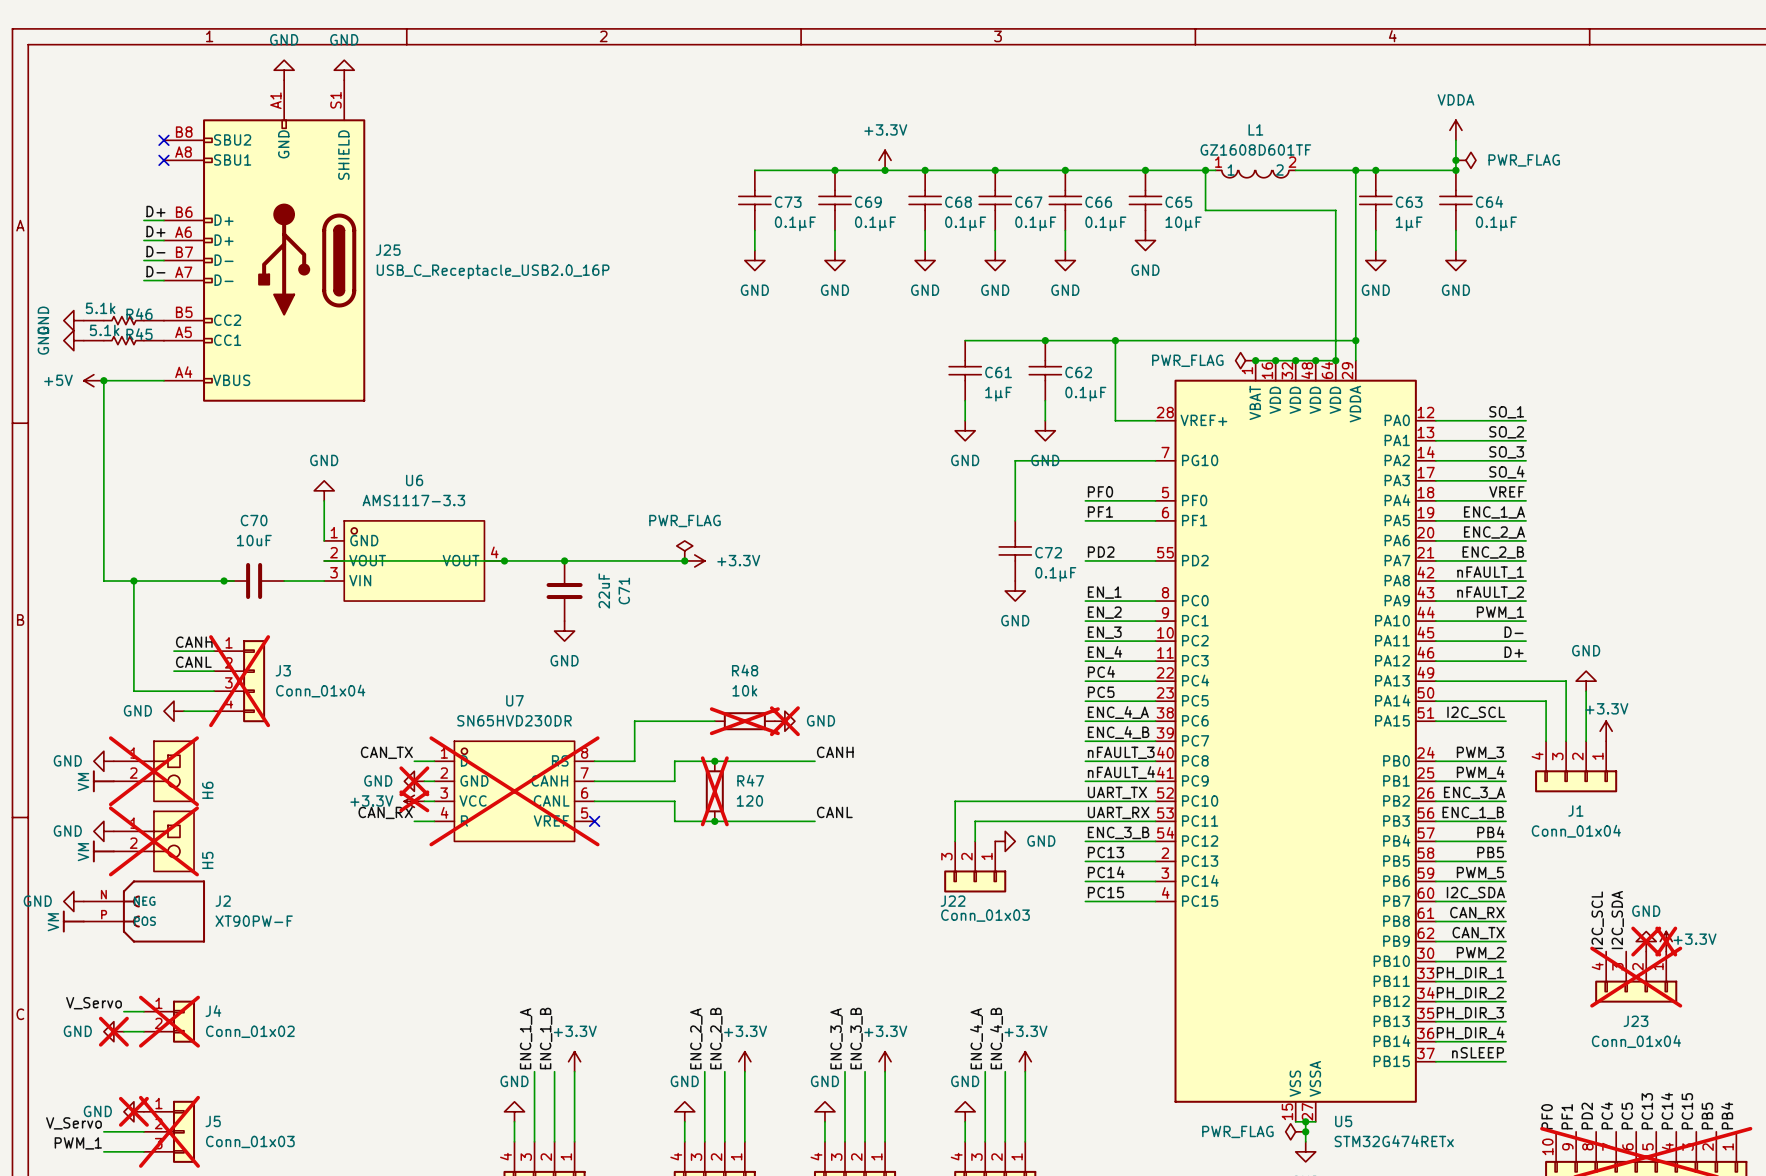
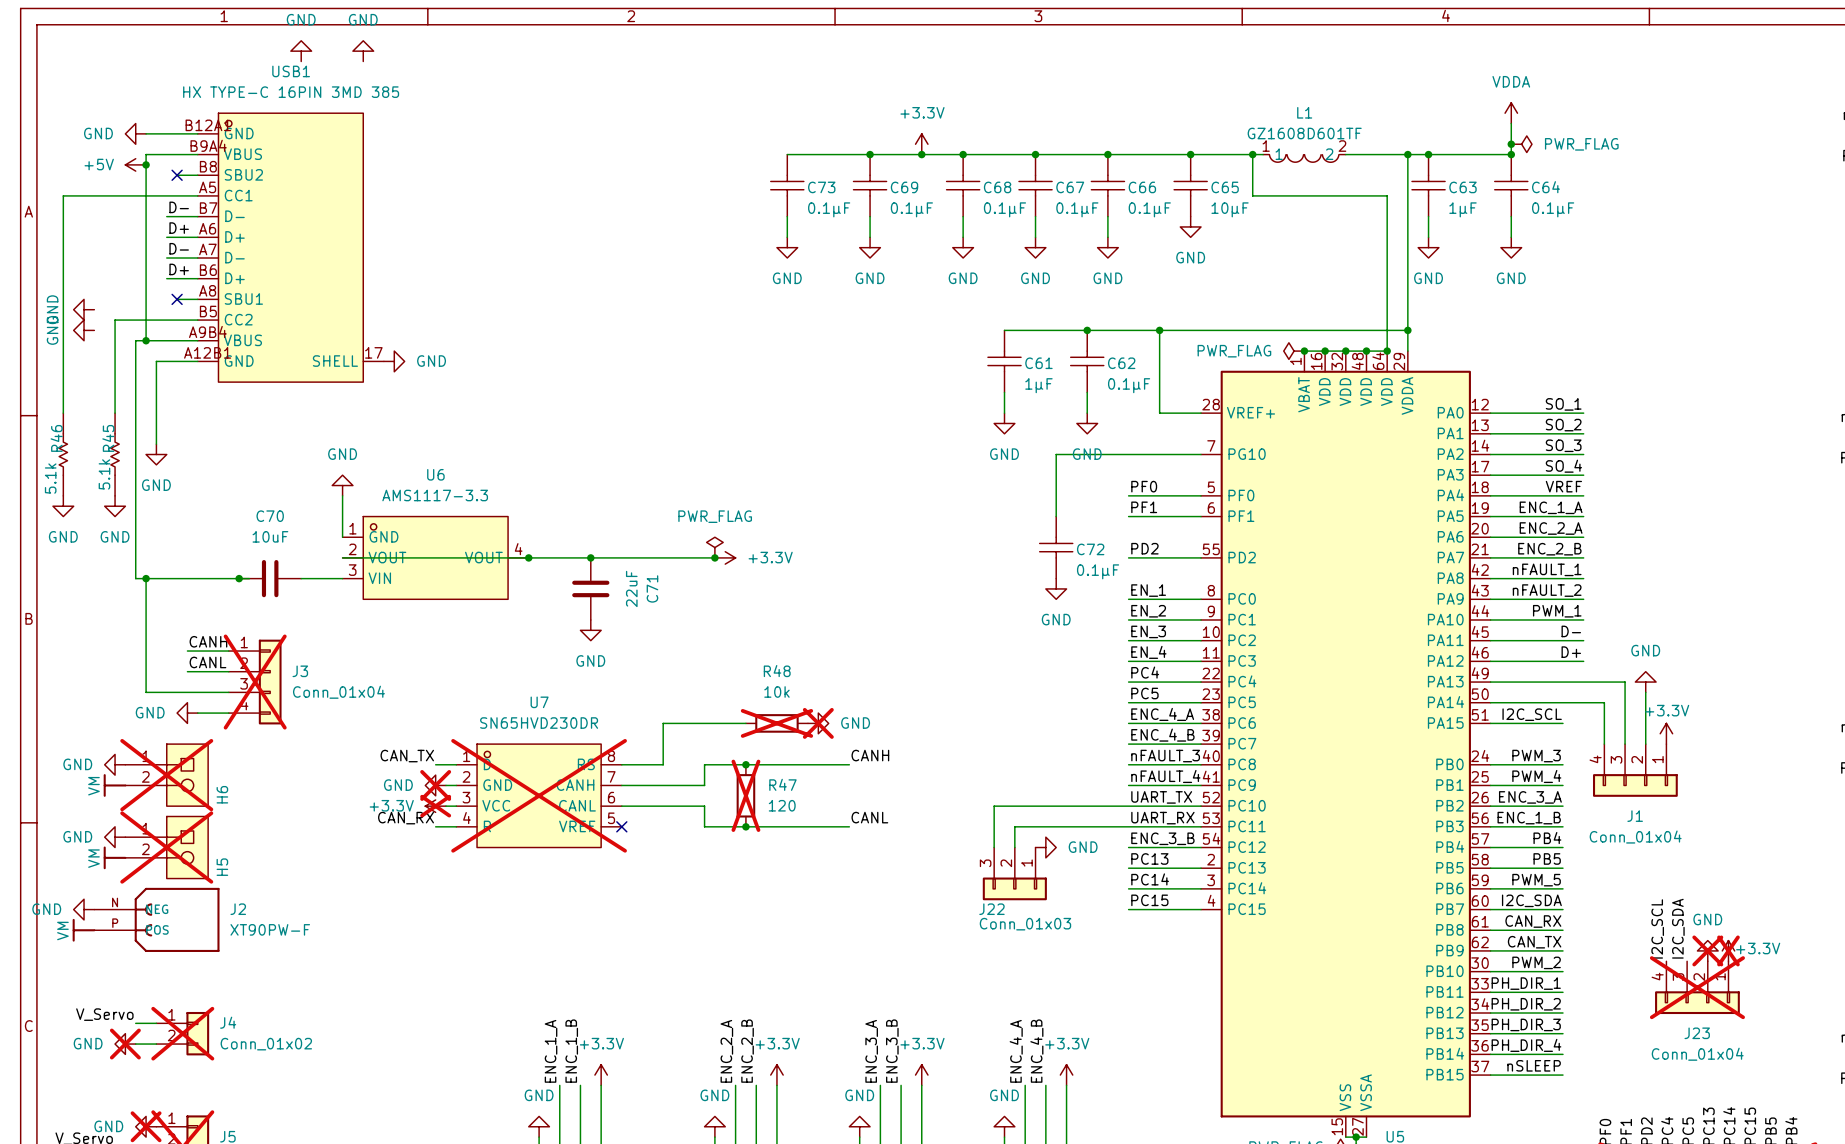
no-connect mark: (163, 140) -> none
power symbol: none -> GND (135, 133)
wire: none -> (146, 133) (197, 133)
no-connect mark: (163, 160) -> none
wire: none -> (197, 154) (146, 154) (146, 340)
power symbol: none -> +5V (135, 164)
junction: none -> (146, 164)
no-connect mark: none -> (177, 175)
wire: none -> (197, 195) (63, 195) (63, 413)
label: D+ (155, 211) -> none
wire: (143, 220) (163, 220) -> (177, 175) (197, 175)
label: none -> D- (179, 207)
wire: none -> (166, 216) (197, 216)
label position: D+ (155, 231) -> D+ (179, 228)
wire: (143, 240) (163, 240) -> none
J25: USB_C_Receptacle_USB2.0_16P (264, 240) -> none
wire: none -> (166, 237) (197, 237)
label: D- (155, 251) -> none
wire: (143, 260) (163, 260) -> none
USB1: none -> HX TYPE-C 16PIN 3MD 385 (290, 247)
label: none -> D- (179, 248)
wire: none -> (166, 258) (197, 258)
label: D- (155, 271) -> none
wire: (143, 280) (163, 280) -> (177, 299) (197, 299)
label: none -> D+ (179, 269)
wire: none -> (166, 278) (197, 278)
R46 text position: 5.1k (100, 308) -> 5.1k (50, 478)
no-connect mark: none -> (177, 299)
R46 name position: R46 (139, 314) -> R46 (56, 438)
R46 rotation: 0° (123, 320) -> 90° clockwise (63, 454)
R46 position: (123, 320) -> (63, 454)
R45 text position: 5.1k (104, 330) -> 5.1k (104, 474)
R45 name position: R45 (139, 334) -> R45 (108, 438)
R45 rotation: 0° (123, 340) -> 90° clockwise (115, 454)
R45 position: (123, 340) -> (115, 454)
wire: none -> (197, 361) (156, 361) (156, 444)
power symbol: none -> GND (394, 361)
power symbol: +5V (93, 380) -> none
wire: (103, 380) (163, 380) -> (115, 371) (115, 320) (197, 320)
junction position: (103, 380) -> (146, 340)
wire: (103, 420) (103, 581) (123, 581) -> (197, 340) (135, 340) (135, 578)
power symbol: none -> GND (156, 454)
power symbol: none -> GND (63, 506)
power symbol: none -> GND (115, 506)

